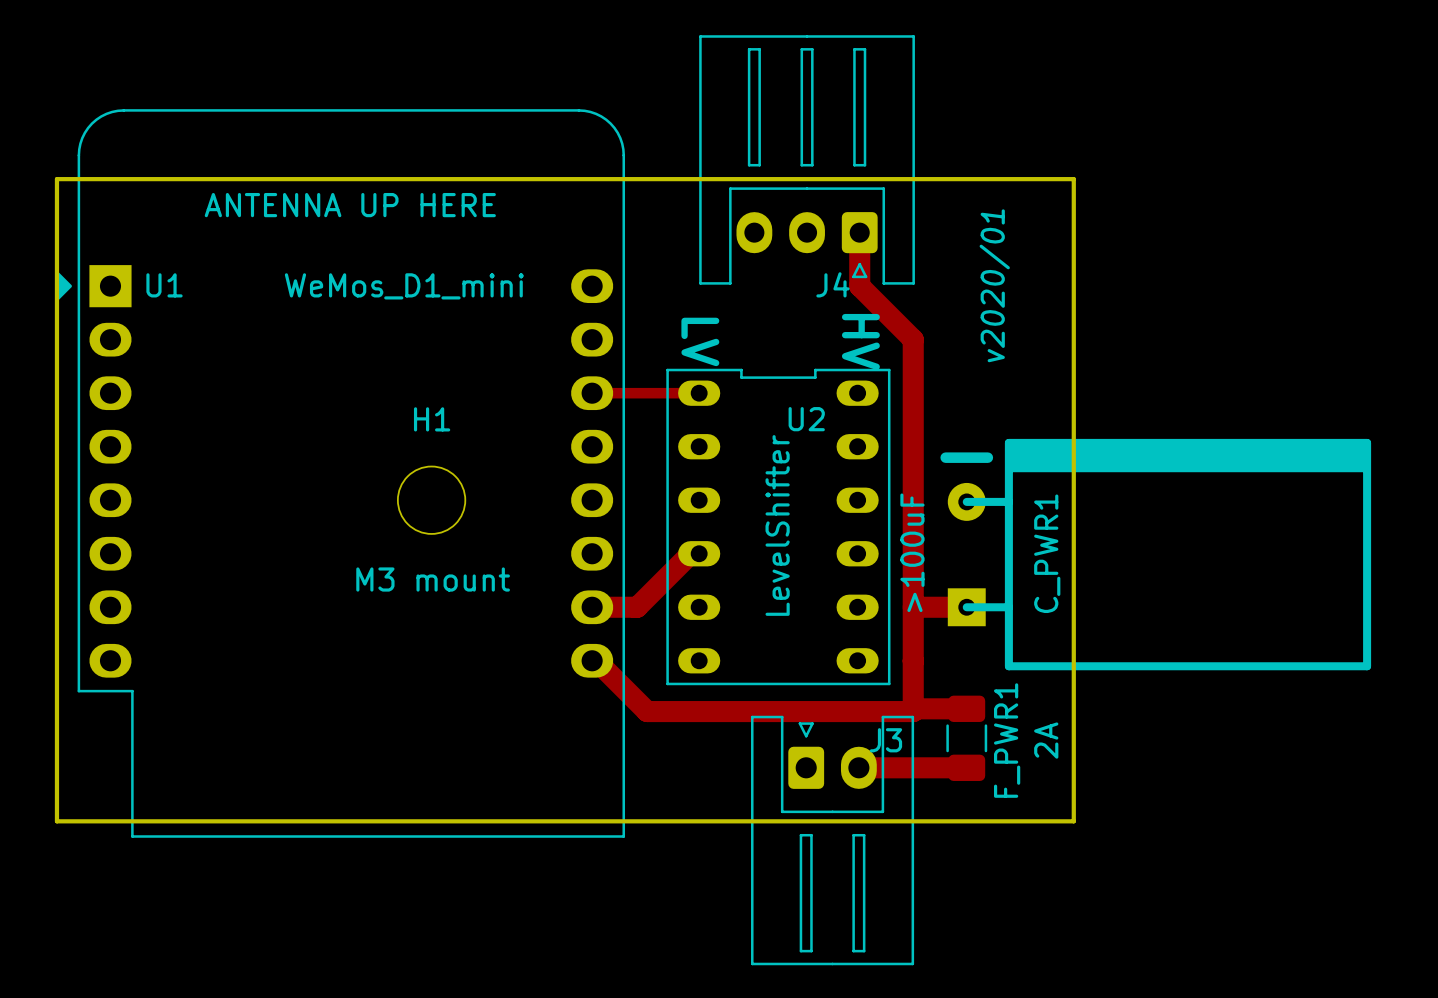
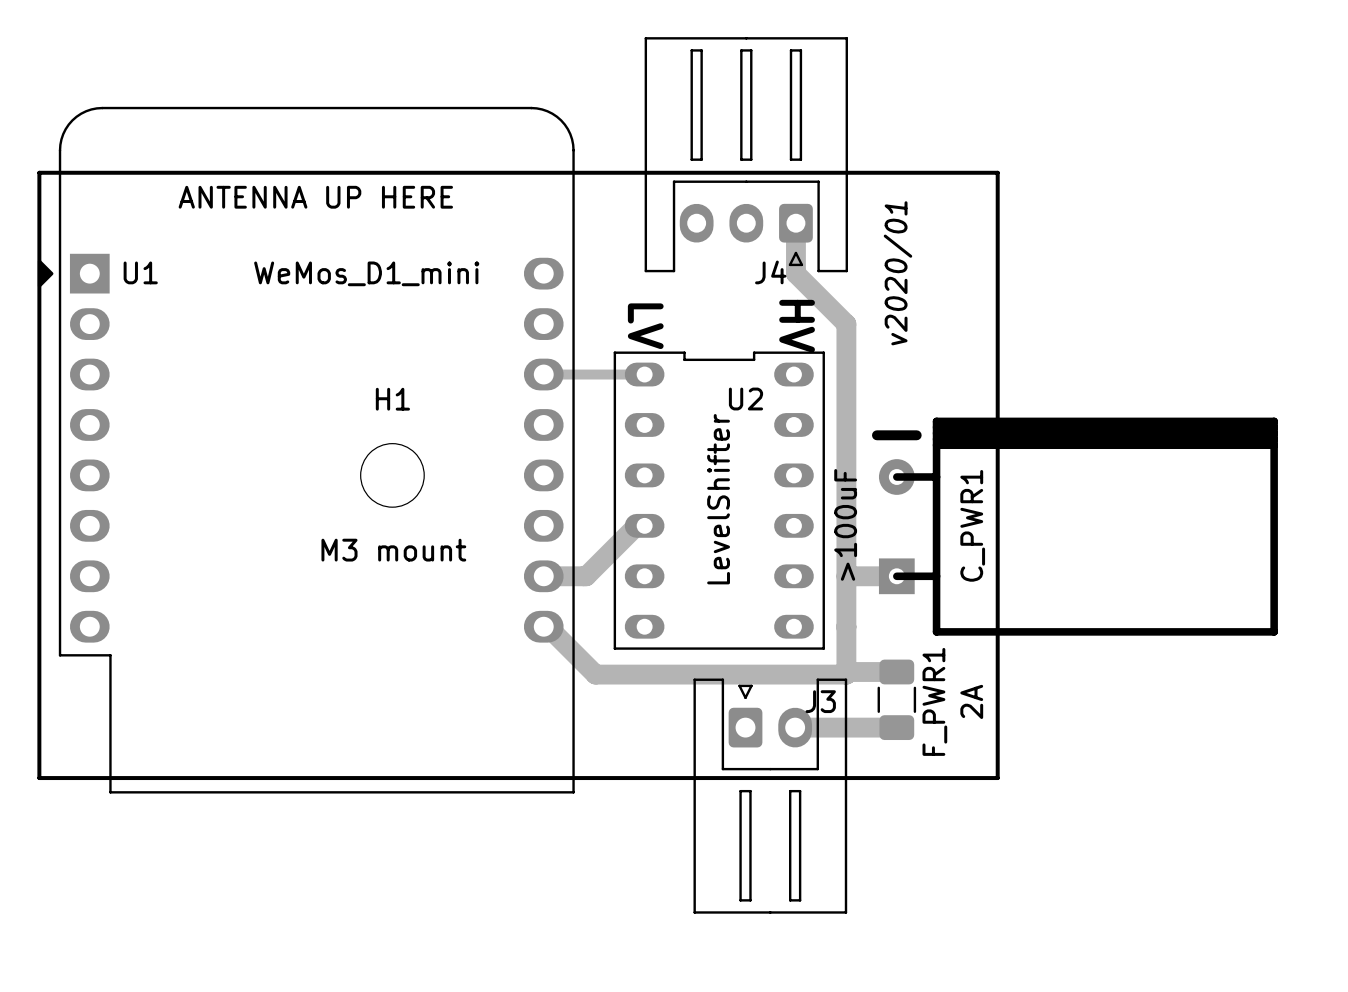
text position: v2020/01 (994, 285) -> v2020/01 (897, 273)

